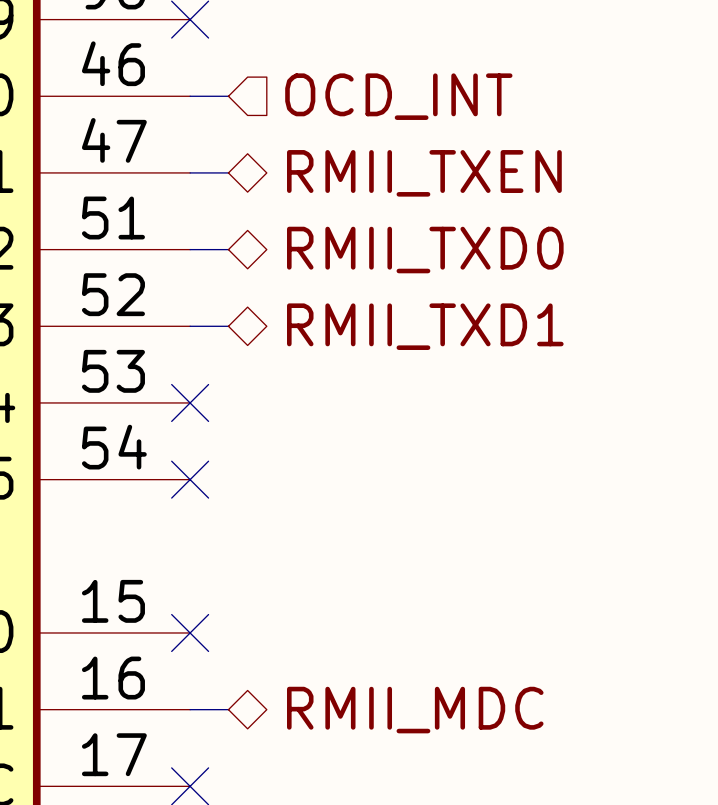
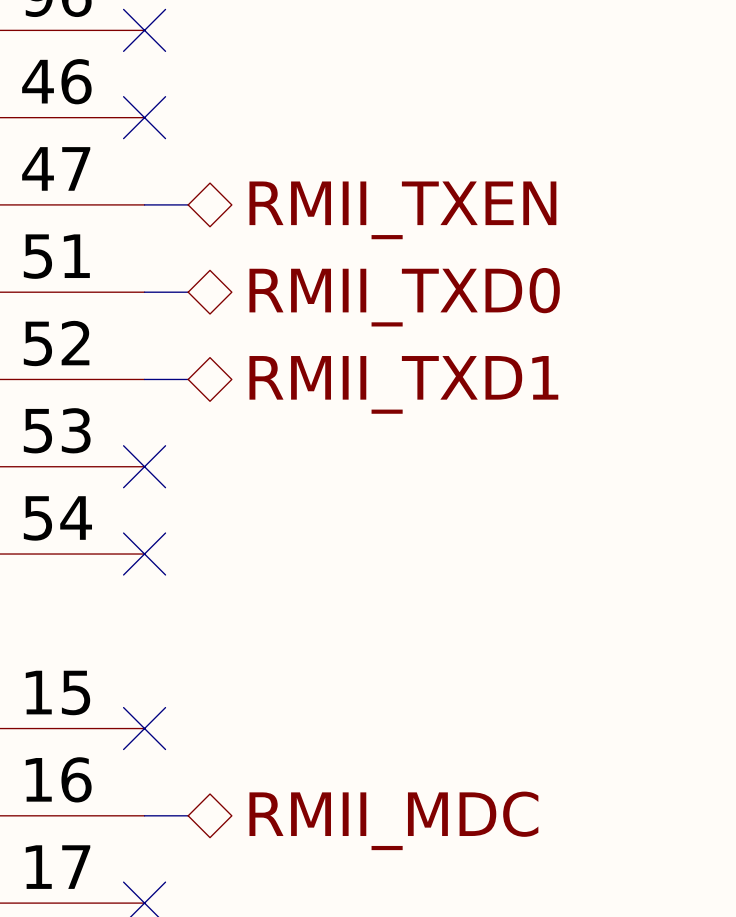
wire: (190, 96) (228, 96) -> none
no-connect mark: none -> (144, 117)
hierarchical label: OCD_INT (398, 96) -> none

